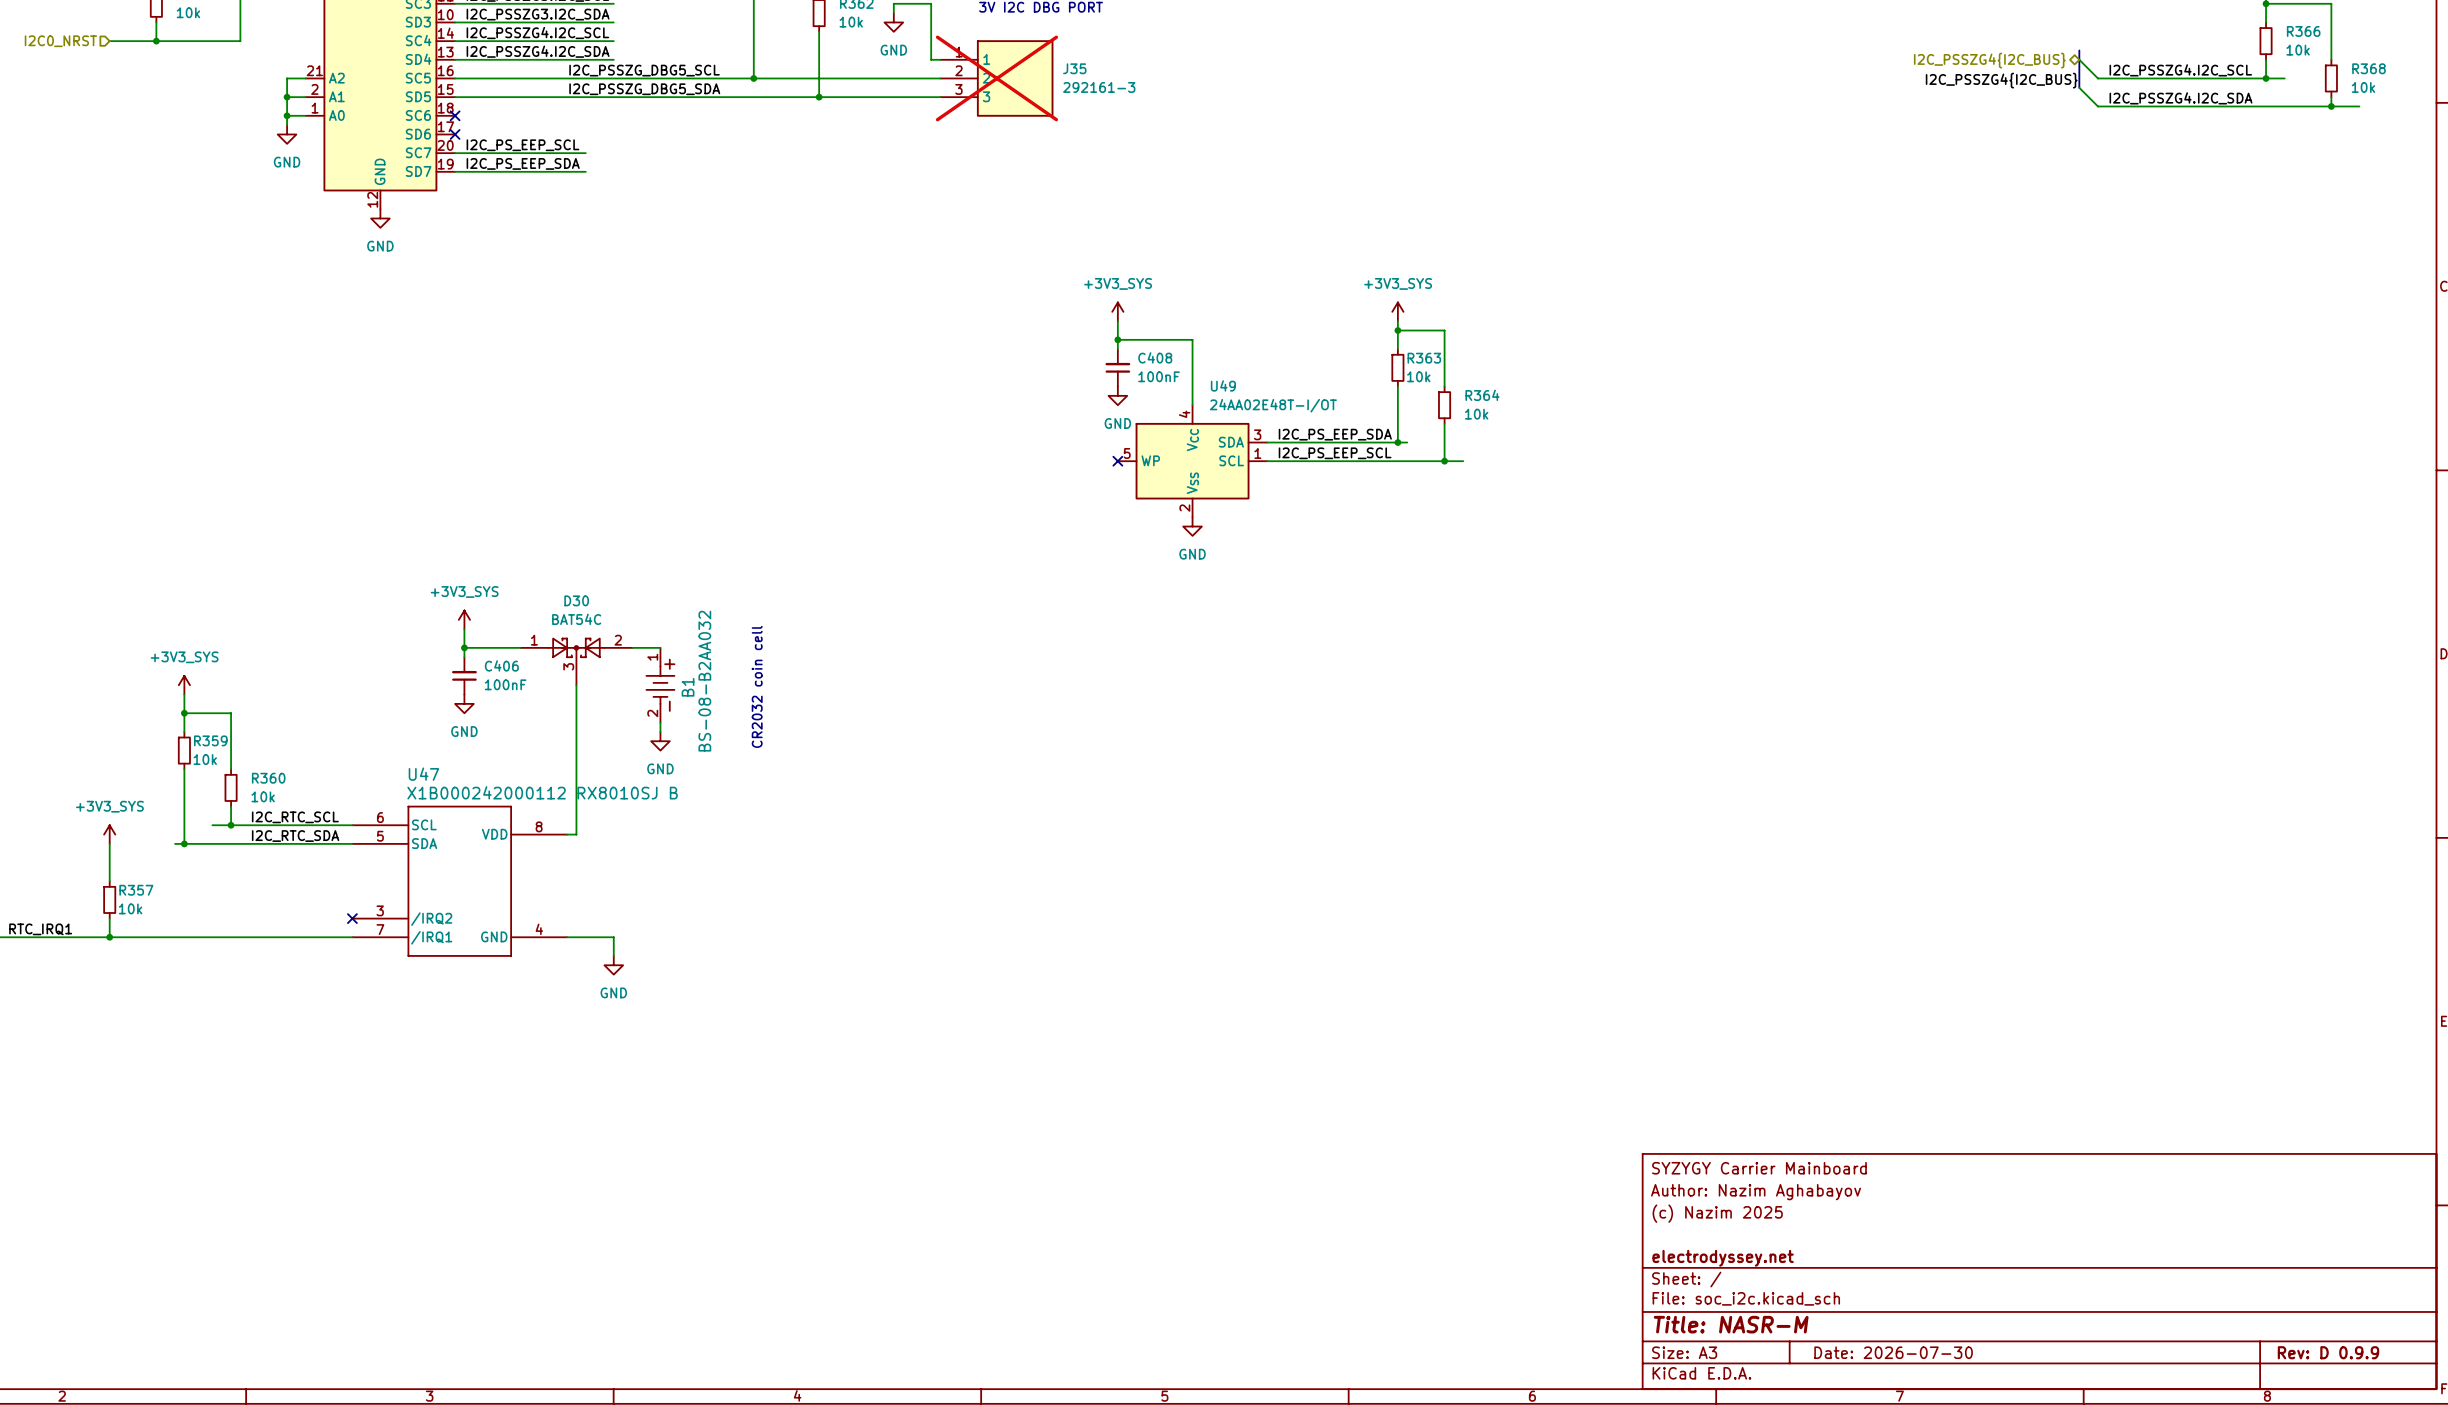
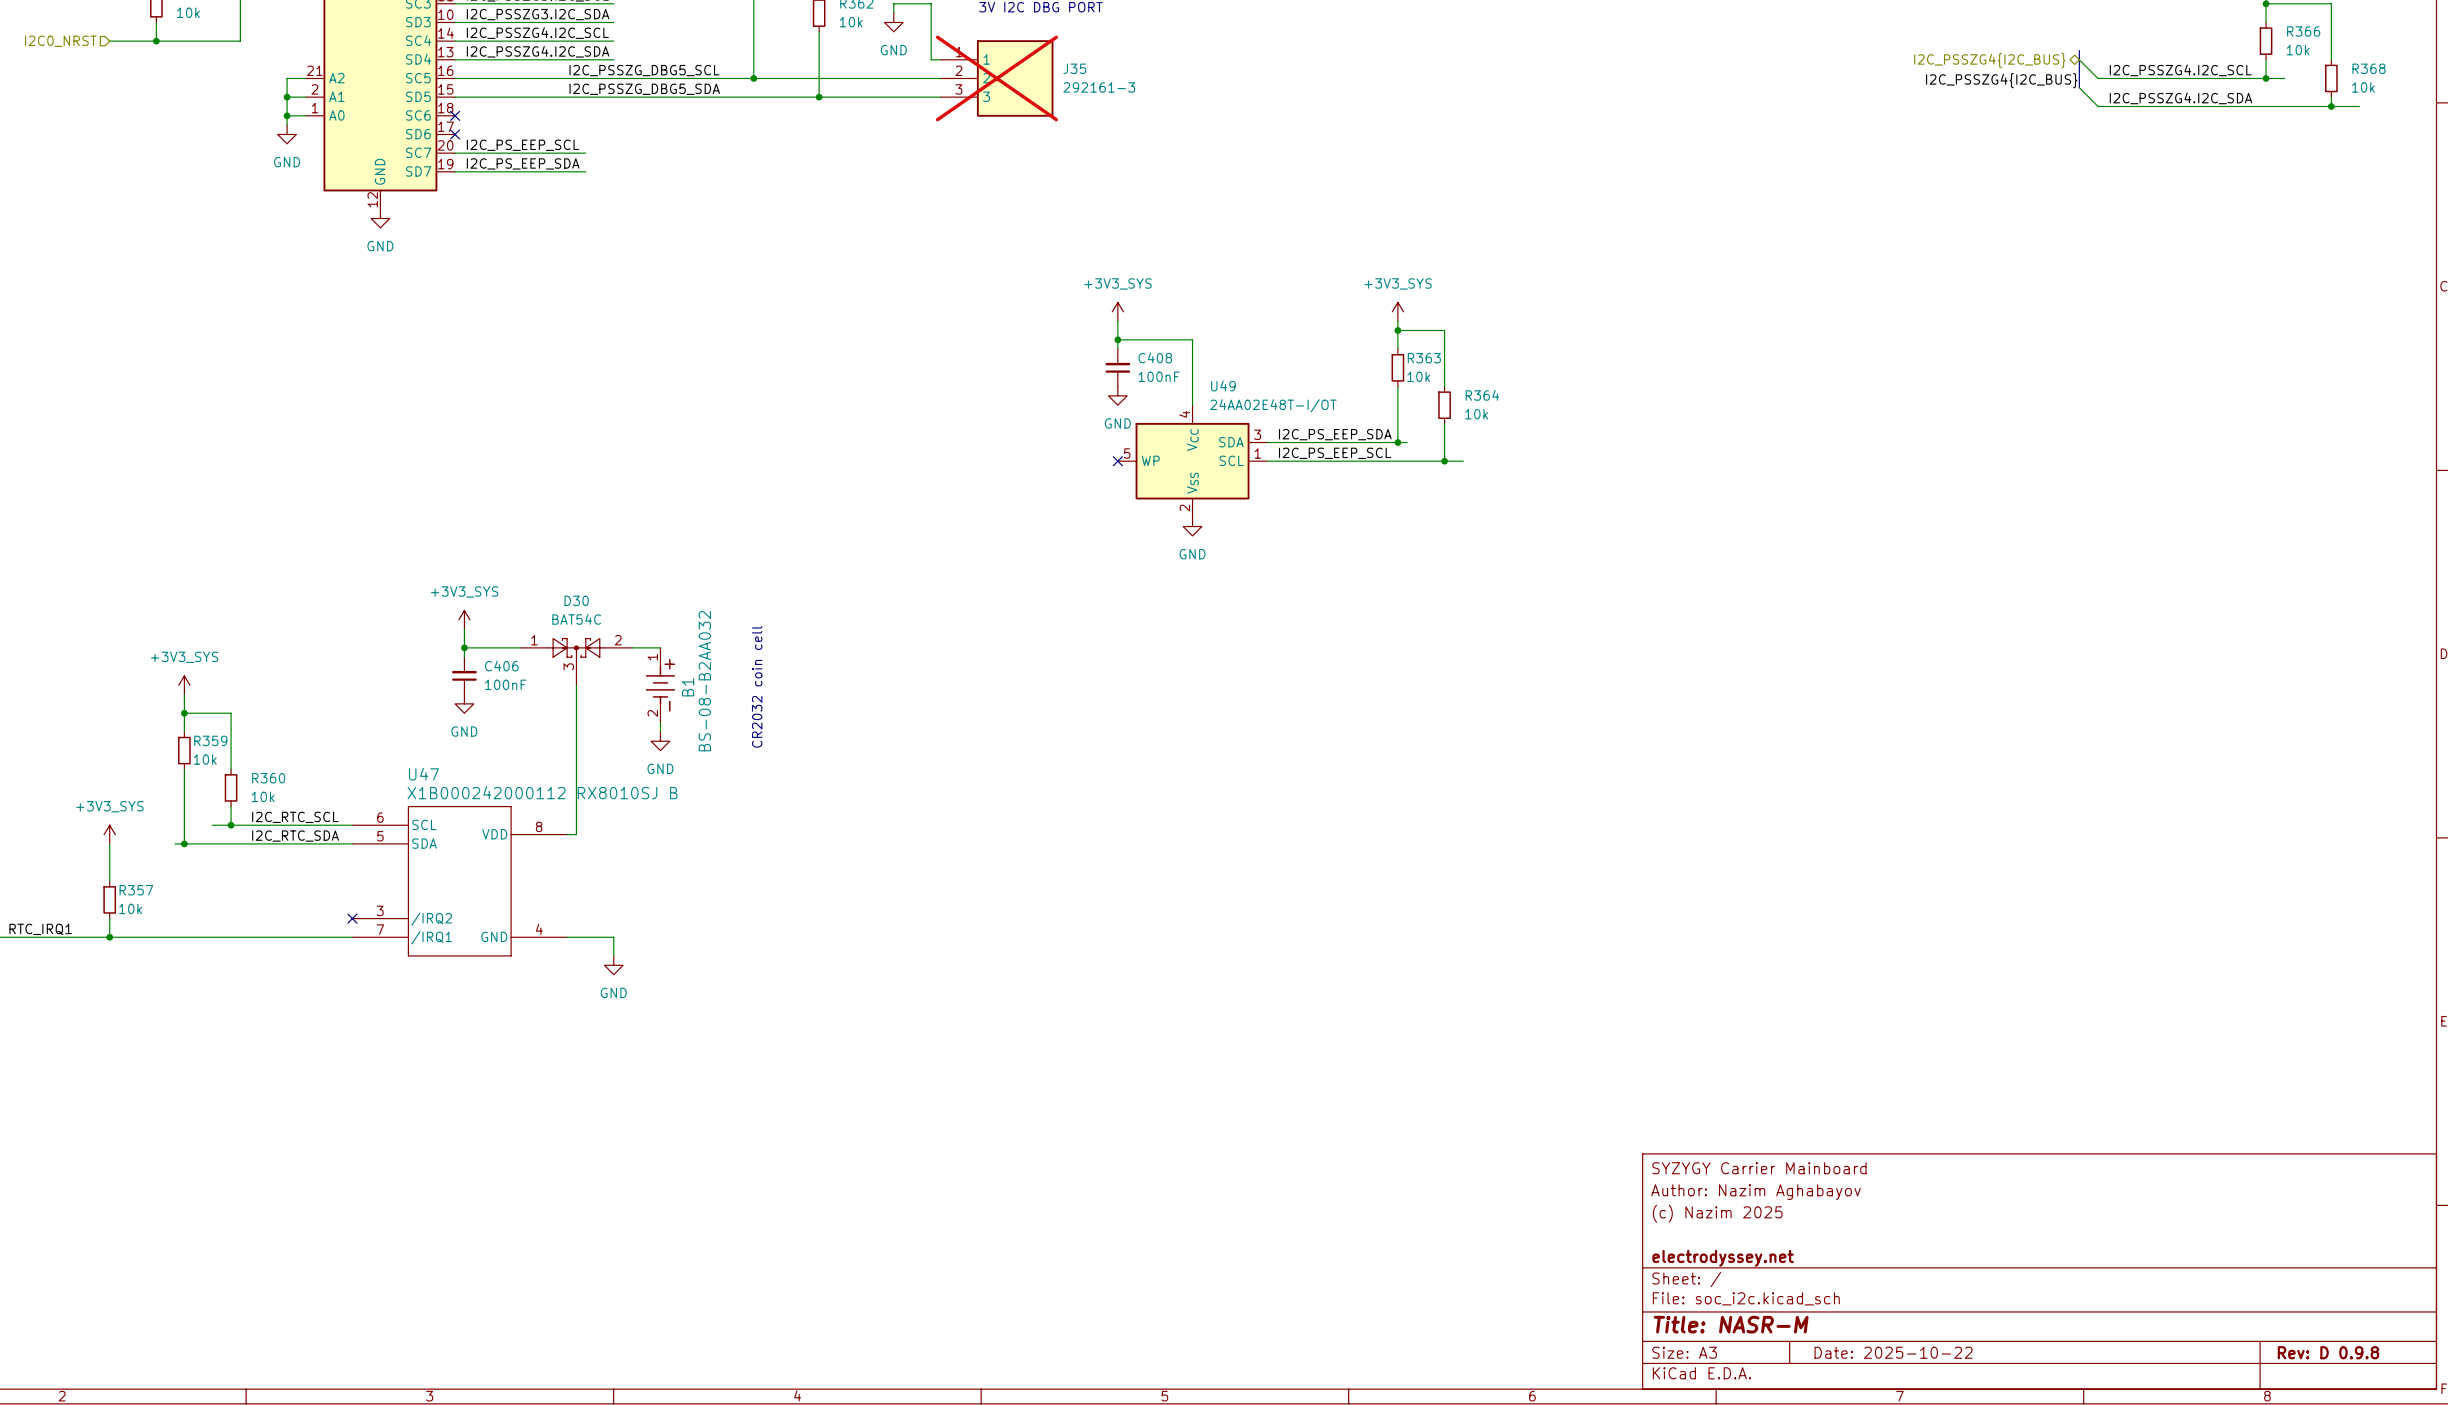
title block: Date: 2026-07-30 (1893, 1352) -> Date: 2025-10-22 (1893, 1352)
title block: Rev: D 0.9.9 (2328, 1352) -> Rev: D 0.9.8 (2328, 1352)

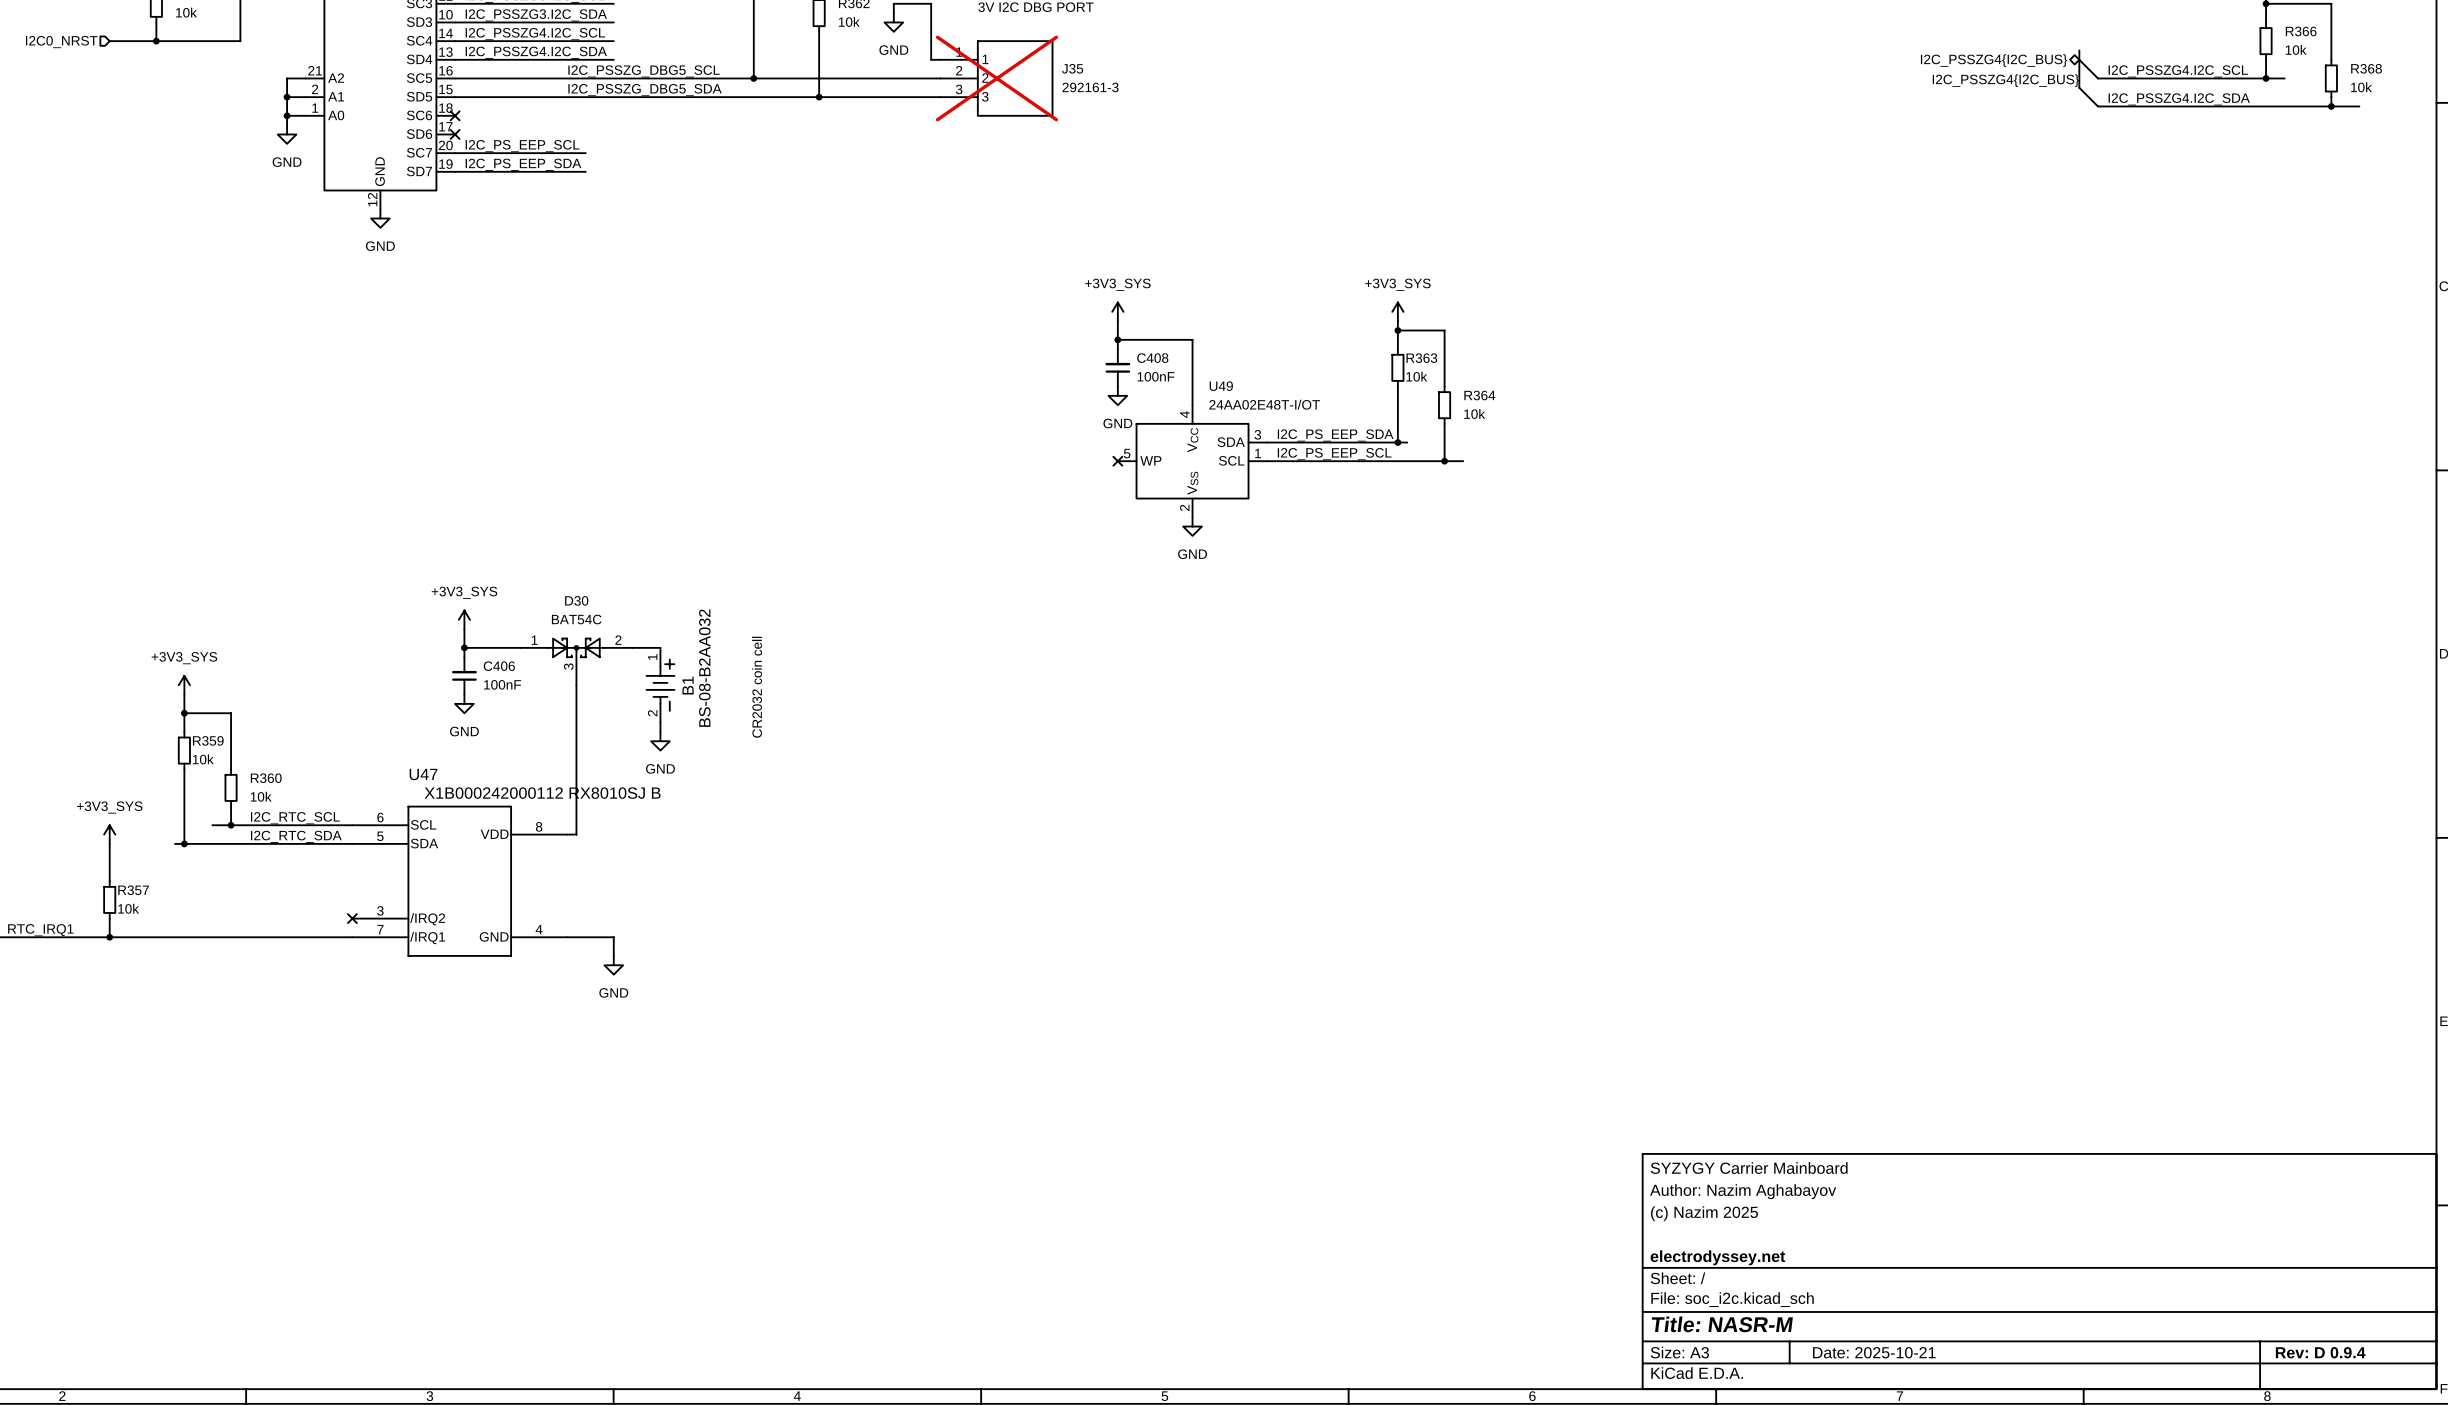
title block: Date: 2025-10-22 (1893, 1352) -> Date: 2025-10-21 (1874, 1352)
title block: Rev: D 0.9.8 (2328, 1352) -> Rev: D 0.9.4 (2320, 1352)

